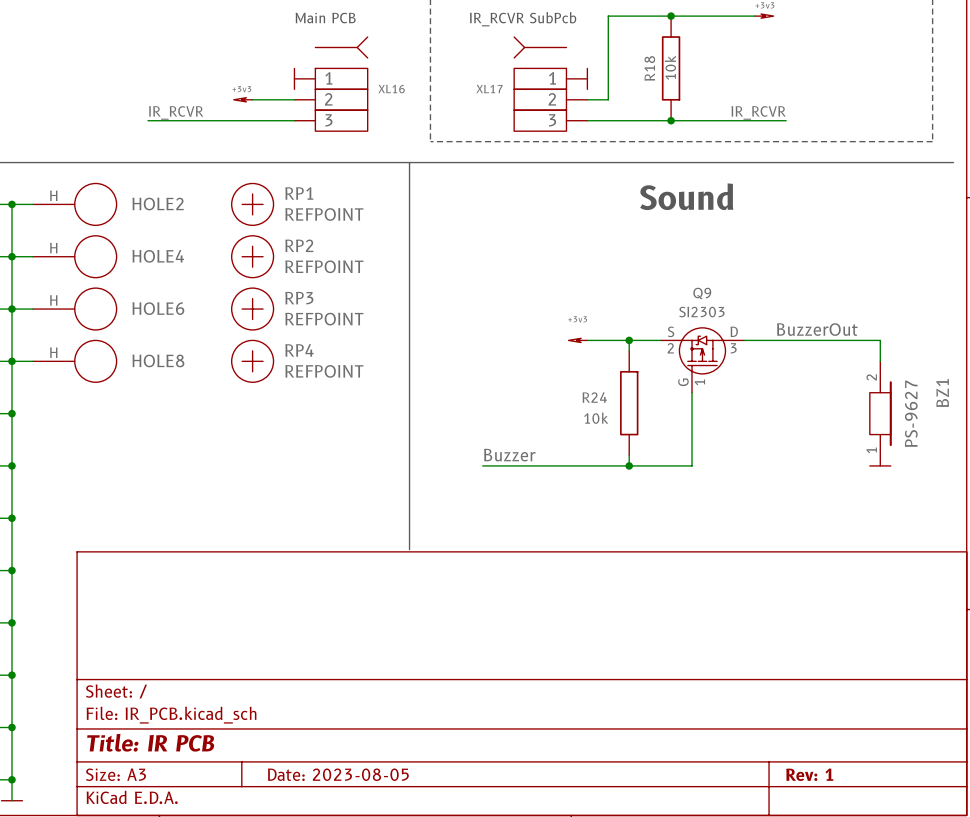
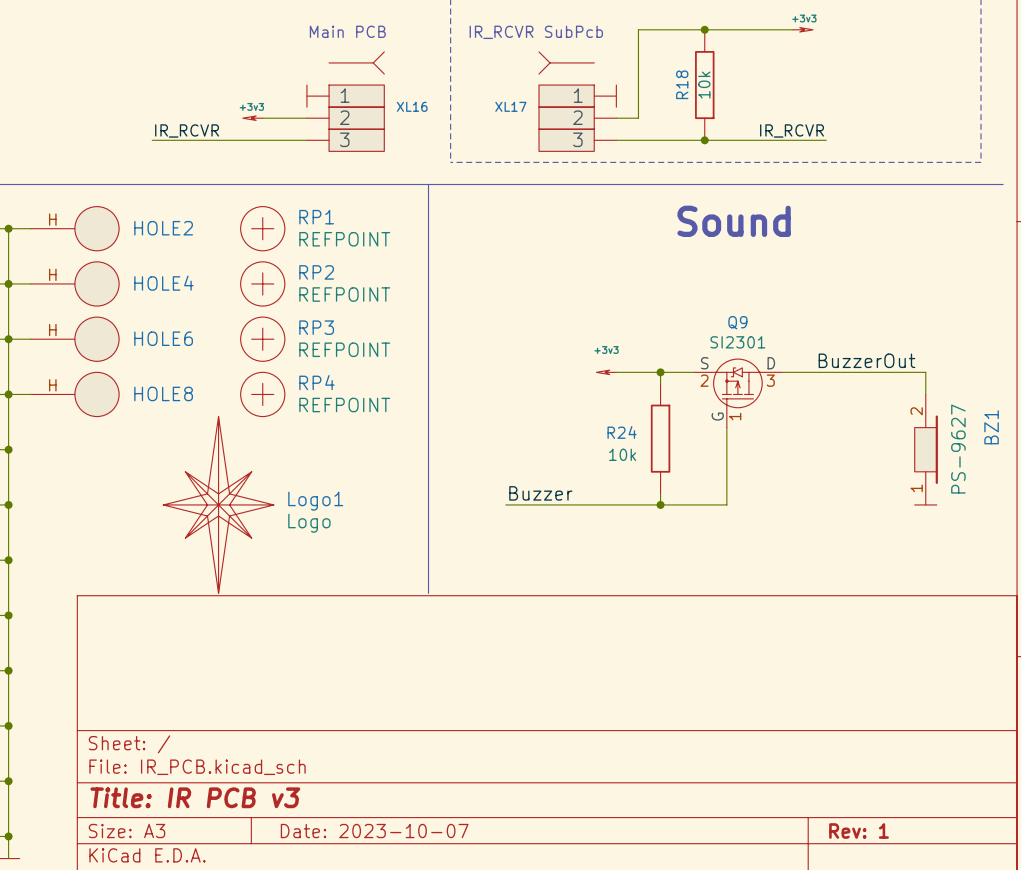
Q9 value: SI2303 (701, 312) -> SI2301 (737, 342)
Logo1: none -> Logo (218, 504)
title block: Title: IR PCB (150, 742) -> Title: IR PCB v3 (195, 797)
title block: Date: 2023-08-05 (338, 774) -> Date: 2023-10-07 (374, 831)

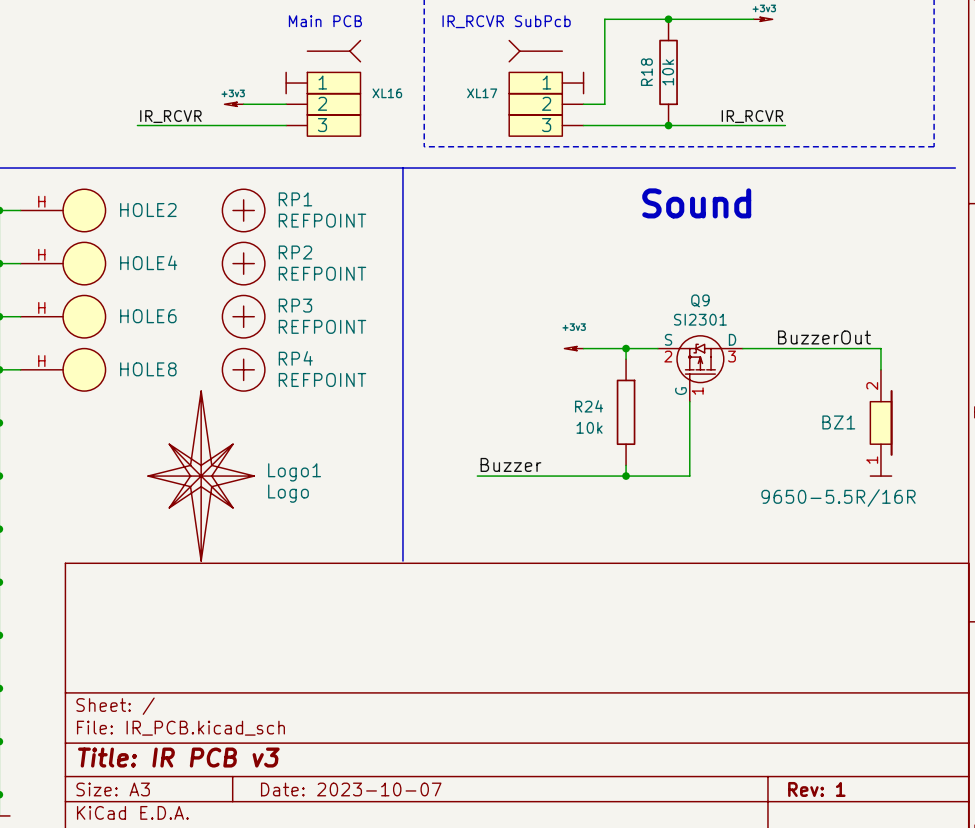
BZ1 name rotation: 0° (991, 427) -> 90° clockwise (838, 422)
BZ1 name position: BZ1 (991, 427) -> BZ1 (838, 422)
BZ1 value: PS-9627 (958, 449) -> 9650-5.5R/16R (838, 498)

